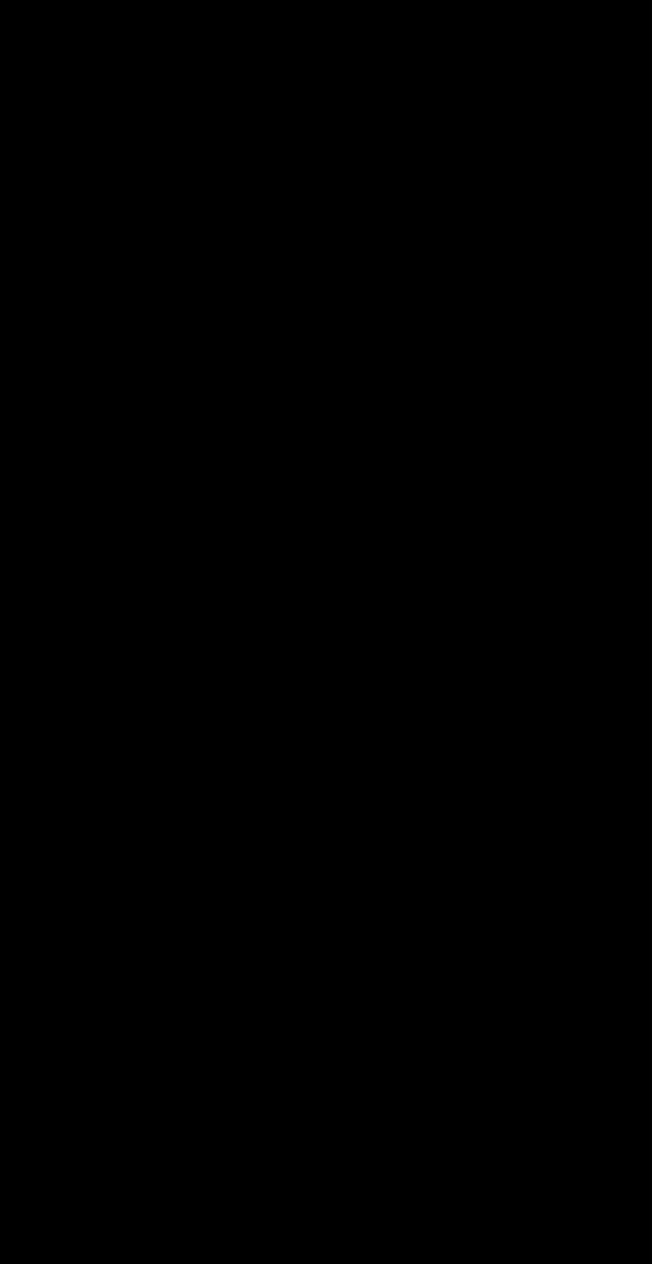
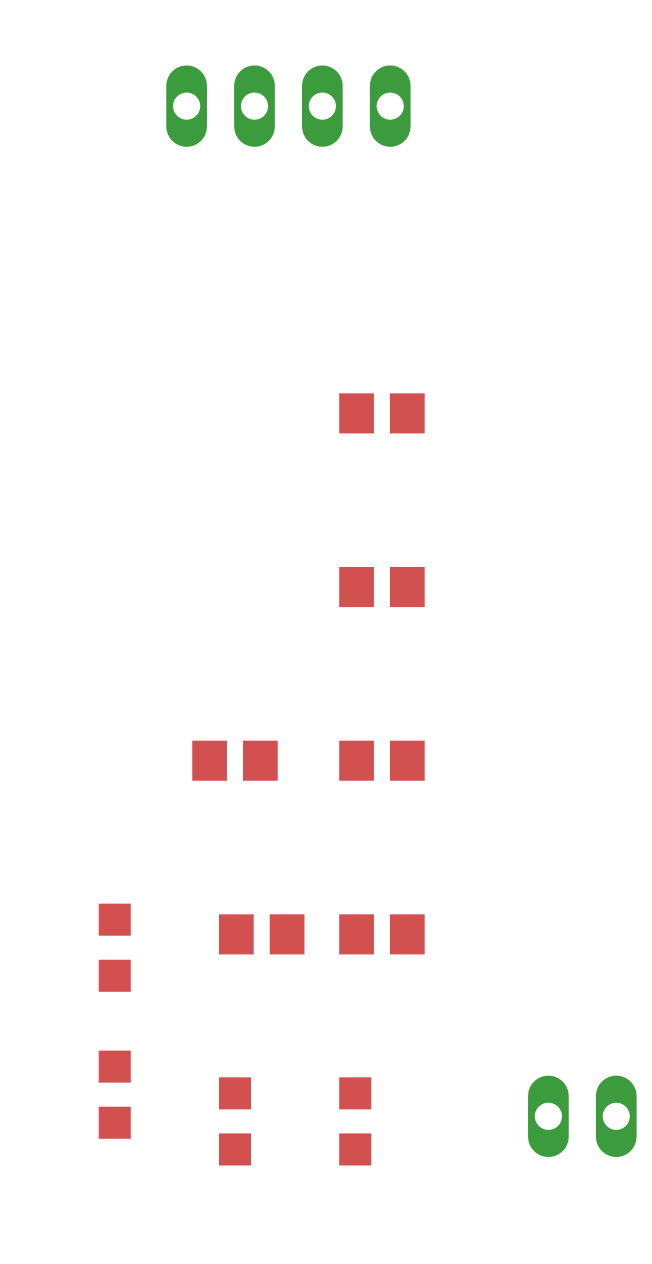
part: none -> (288, 106)
part: none -> (381, 413)
part: none -> (381, 587)
part: none -> (234, 760)
part: none -> (381, 760)
part: none -> (261, 934)
part: none -> (381, 934)
part: none -> (114, 947)
part: none -> (114, 1094)
part: none -> (582, 1116)
part: none -> (234, 1121)
part: none -> (355, 1121)

